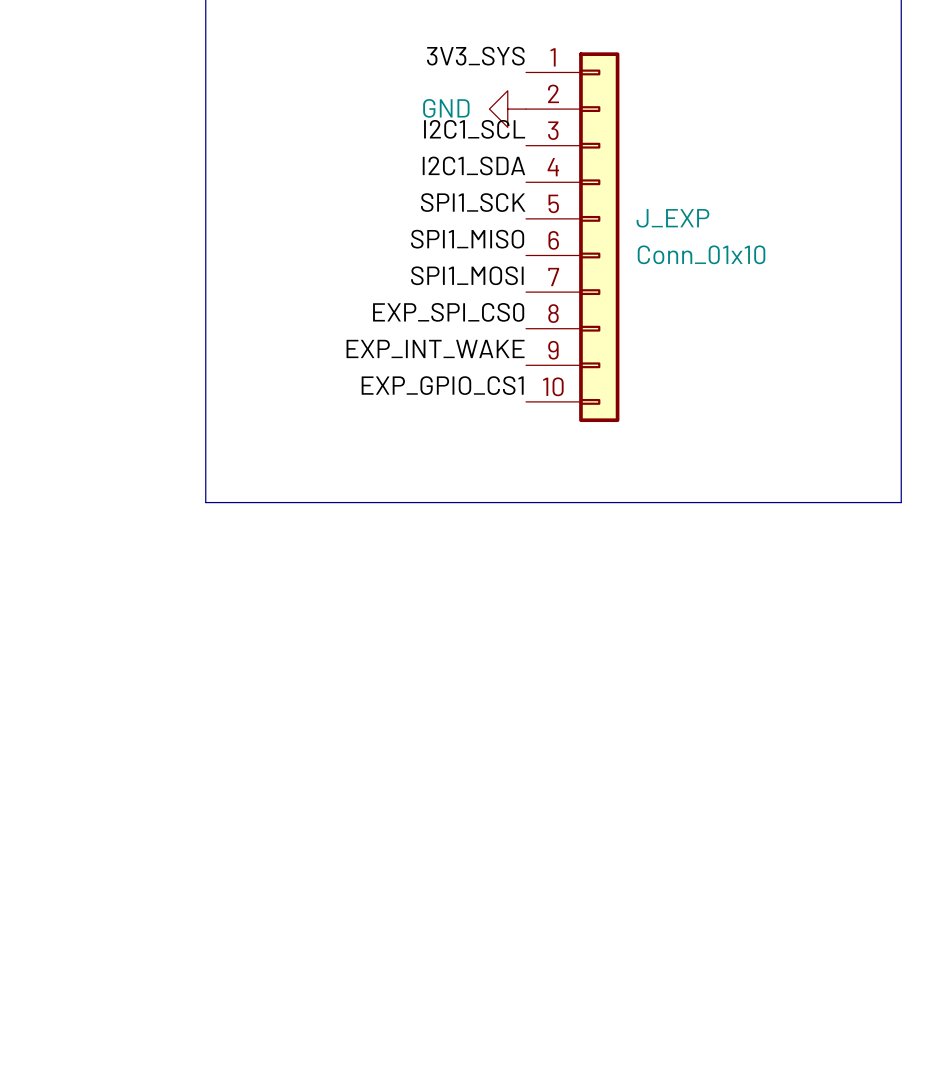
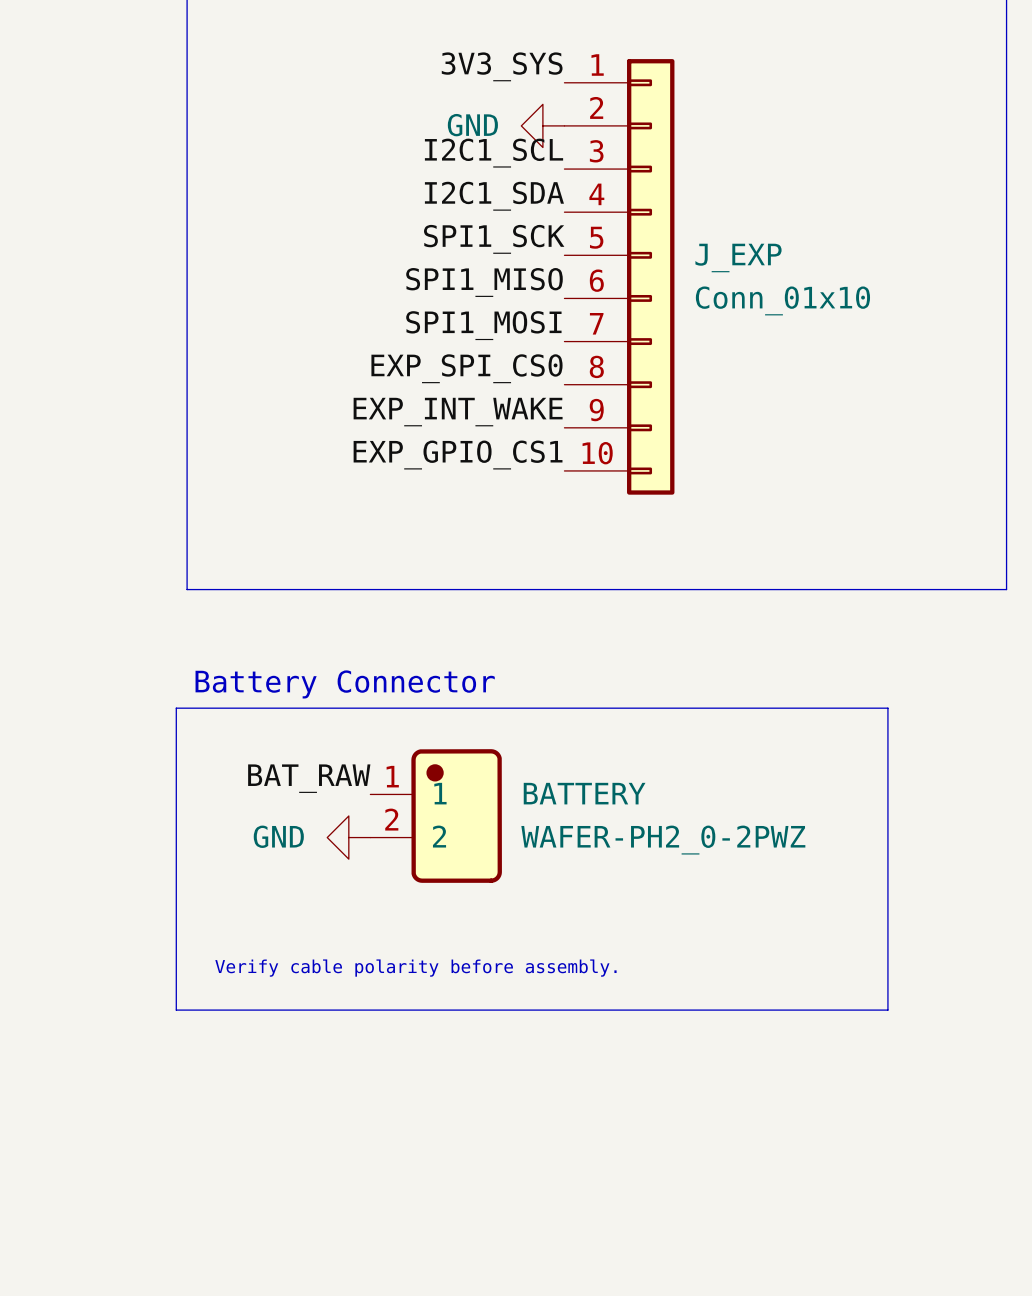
text: none -> Battery Connector (345, 684)
line: none -> (176, 708) (887, 708) (887, 1010) (176, 1010) (176, 708)
label: none -> BAT_RAW (309, 778)
BATTERY: none -> WAFER-PH2_0-2PWZ (436, 816)
power symbol: none -> GND (348, 837)
text: none -> Verify cable polarity before assembly. (415, 968)

